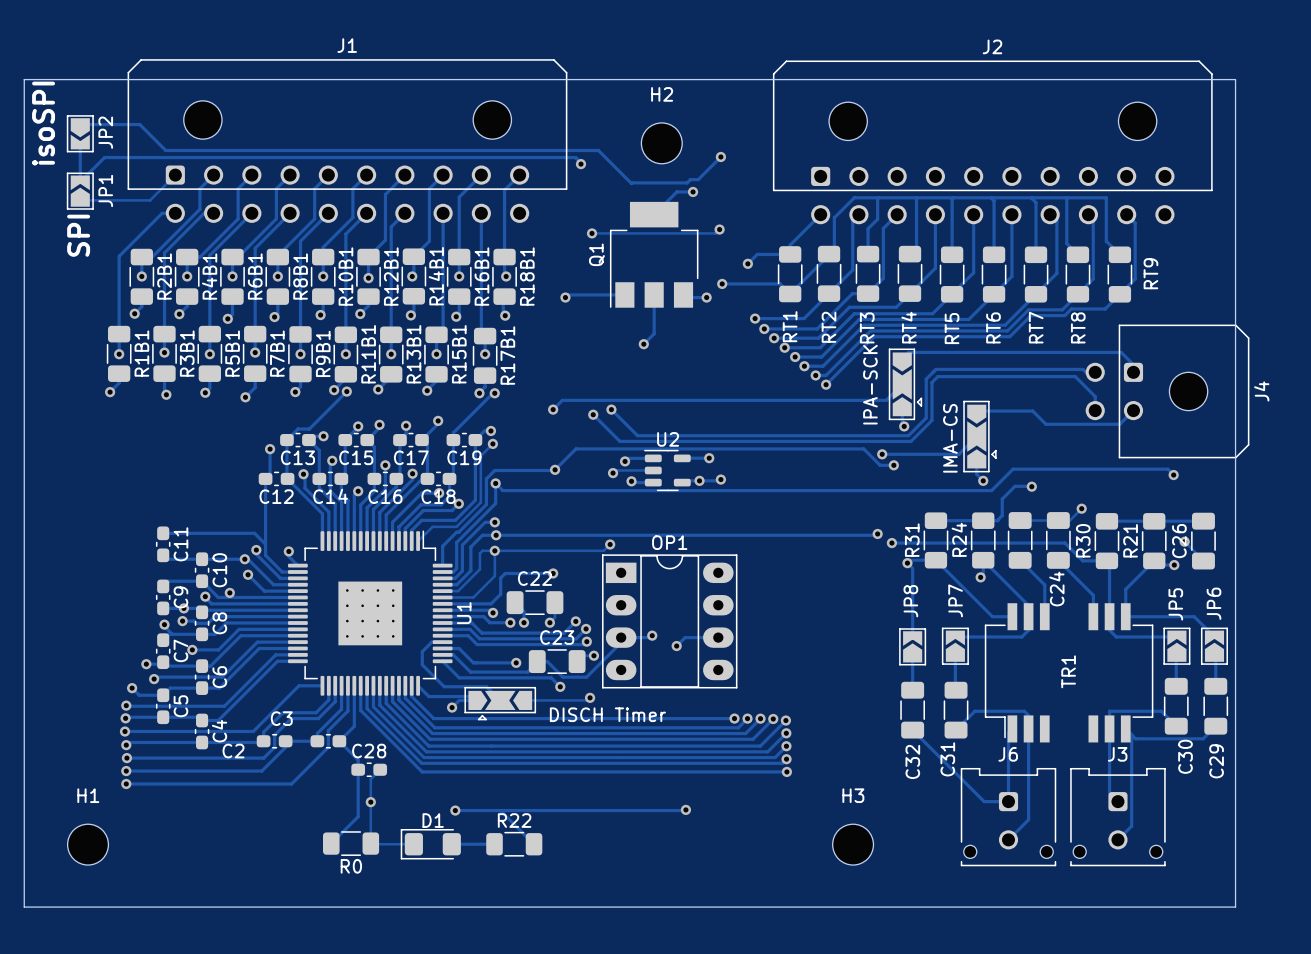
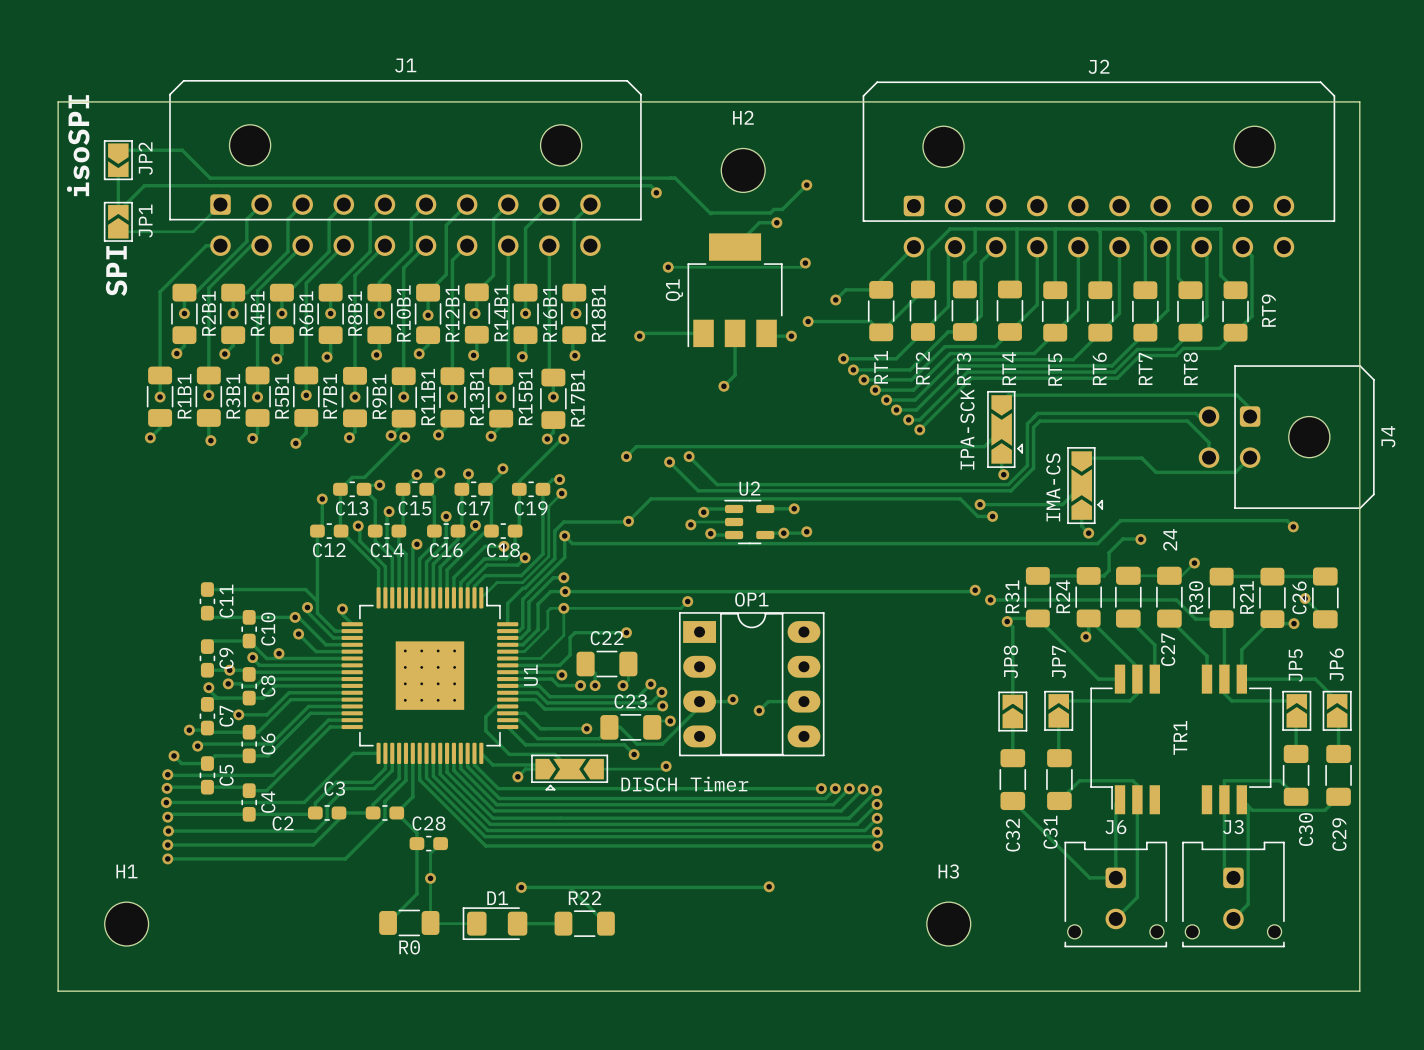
24 name: none -> 24 (1170, 539)
C24 name: C24 (1056, 589) -> C27 (1168, 649)

